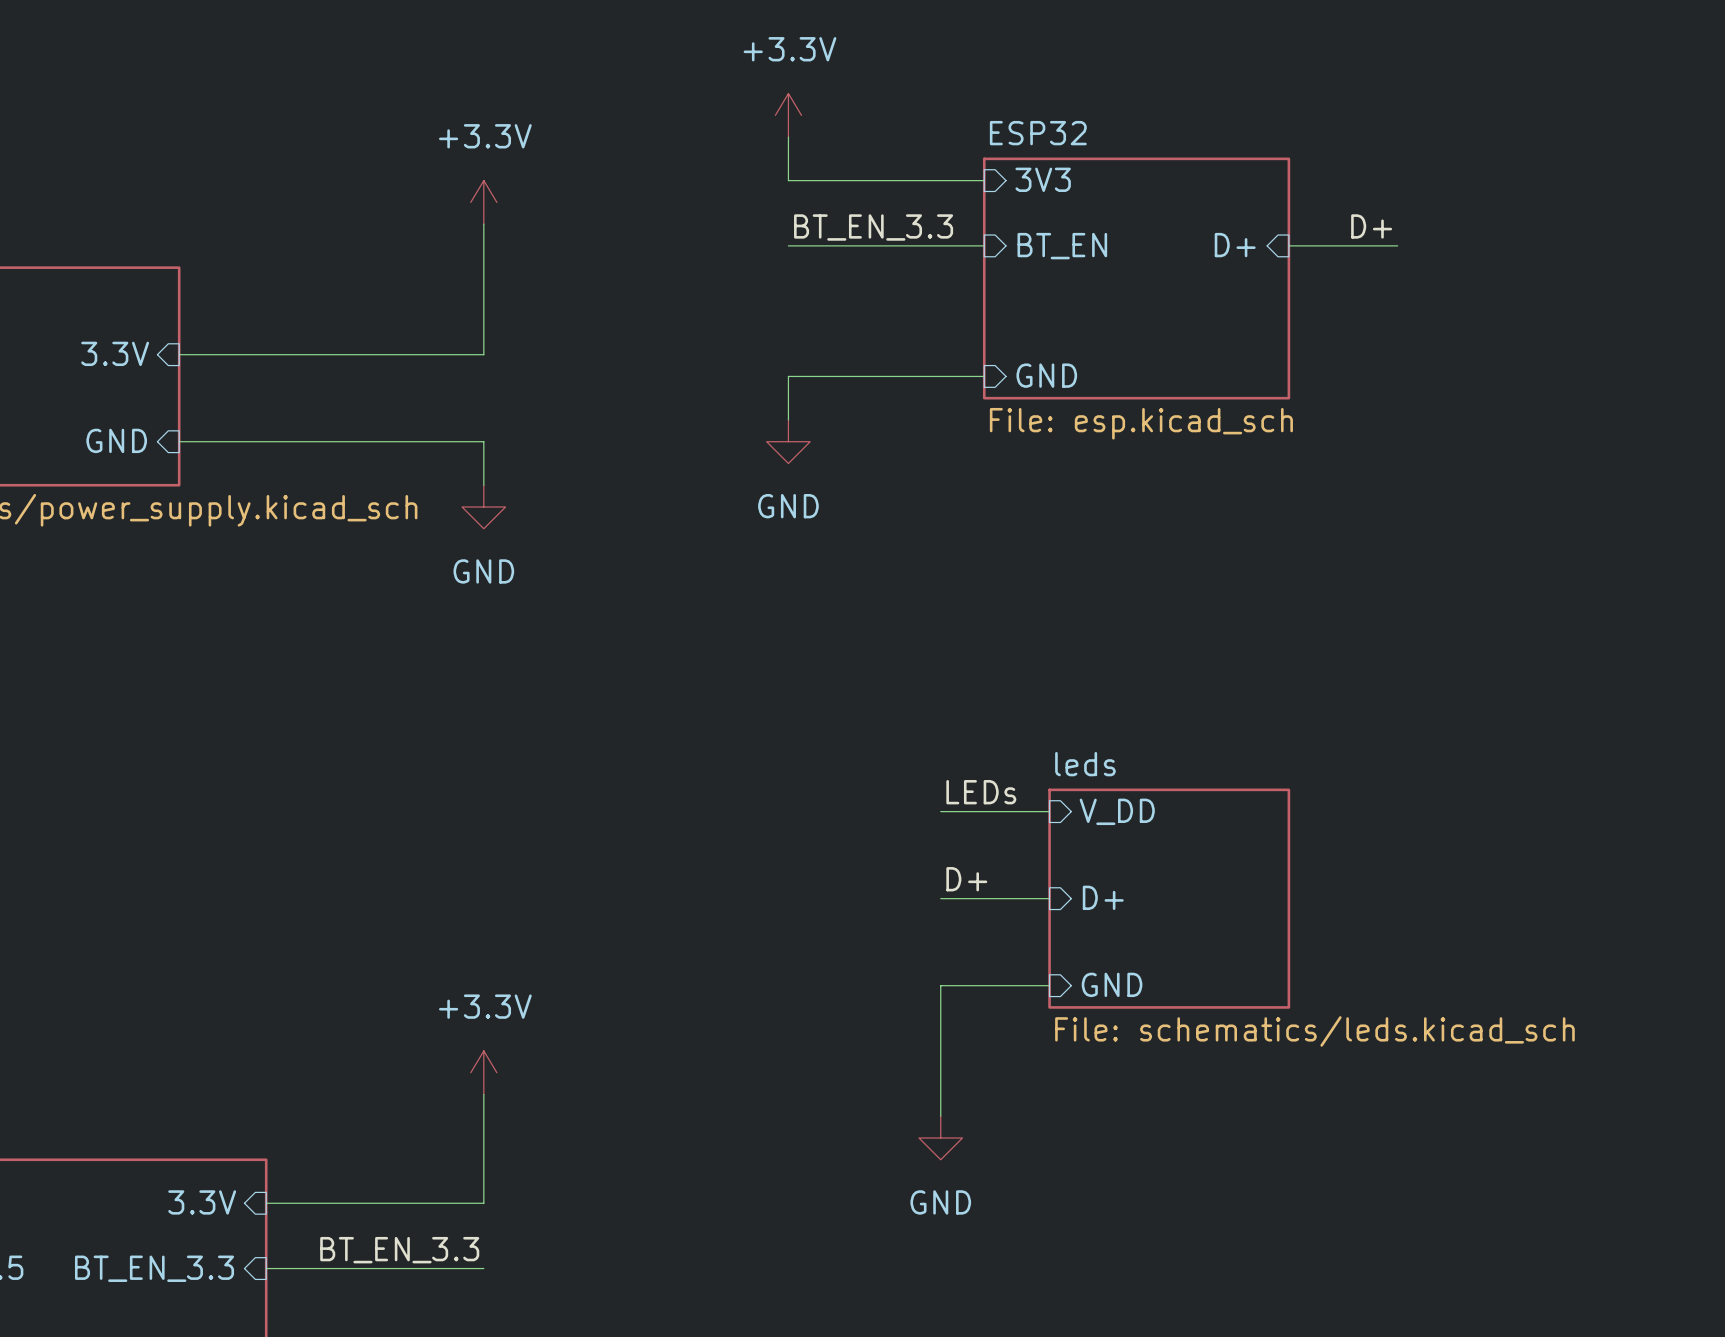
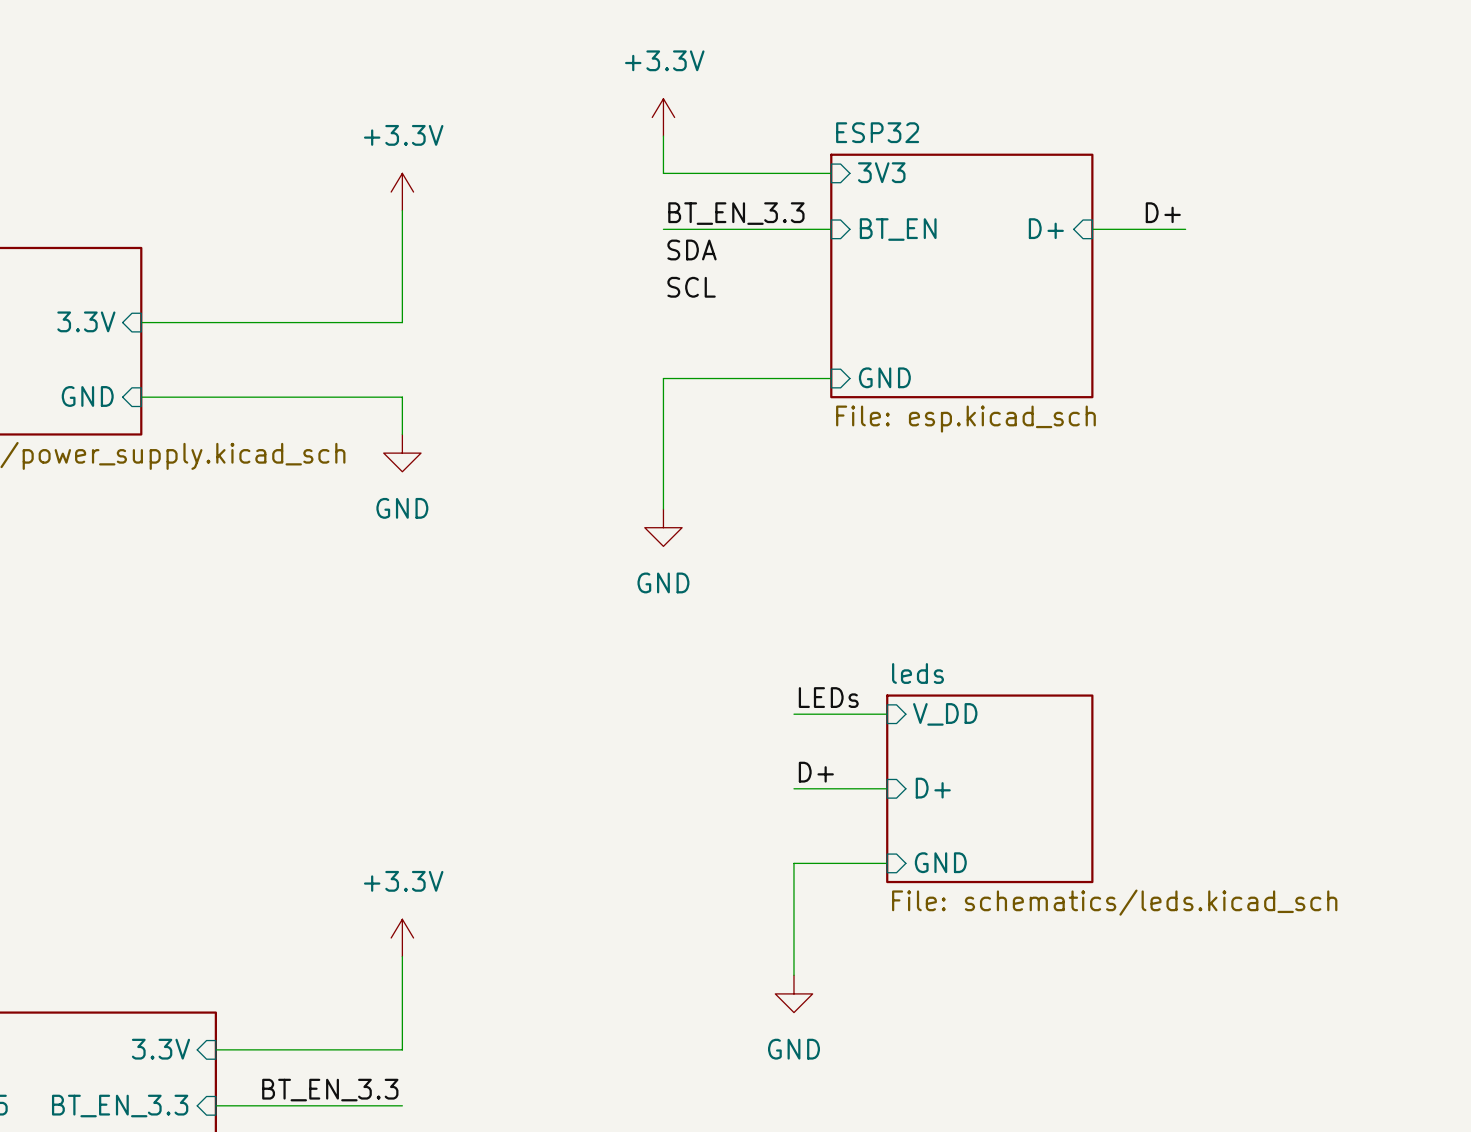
sheet ESP32 shape: [982, 157, 1291, 400] -> [830, 153, 1094, 399]
label: none -> SDA (692, 249)
label: none -> SCL (691, 287)
sheet pin position: GND (1046, 375) -> GND (884, 377)
wire: (984, 376) (788, 376) (788, 419) -> none
wire: none -> (831, 378) (663, 378) (663, 509)
power symbol position: GND (788, 441) -> GND (663, 527)

